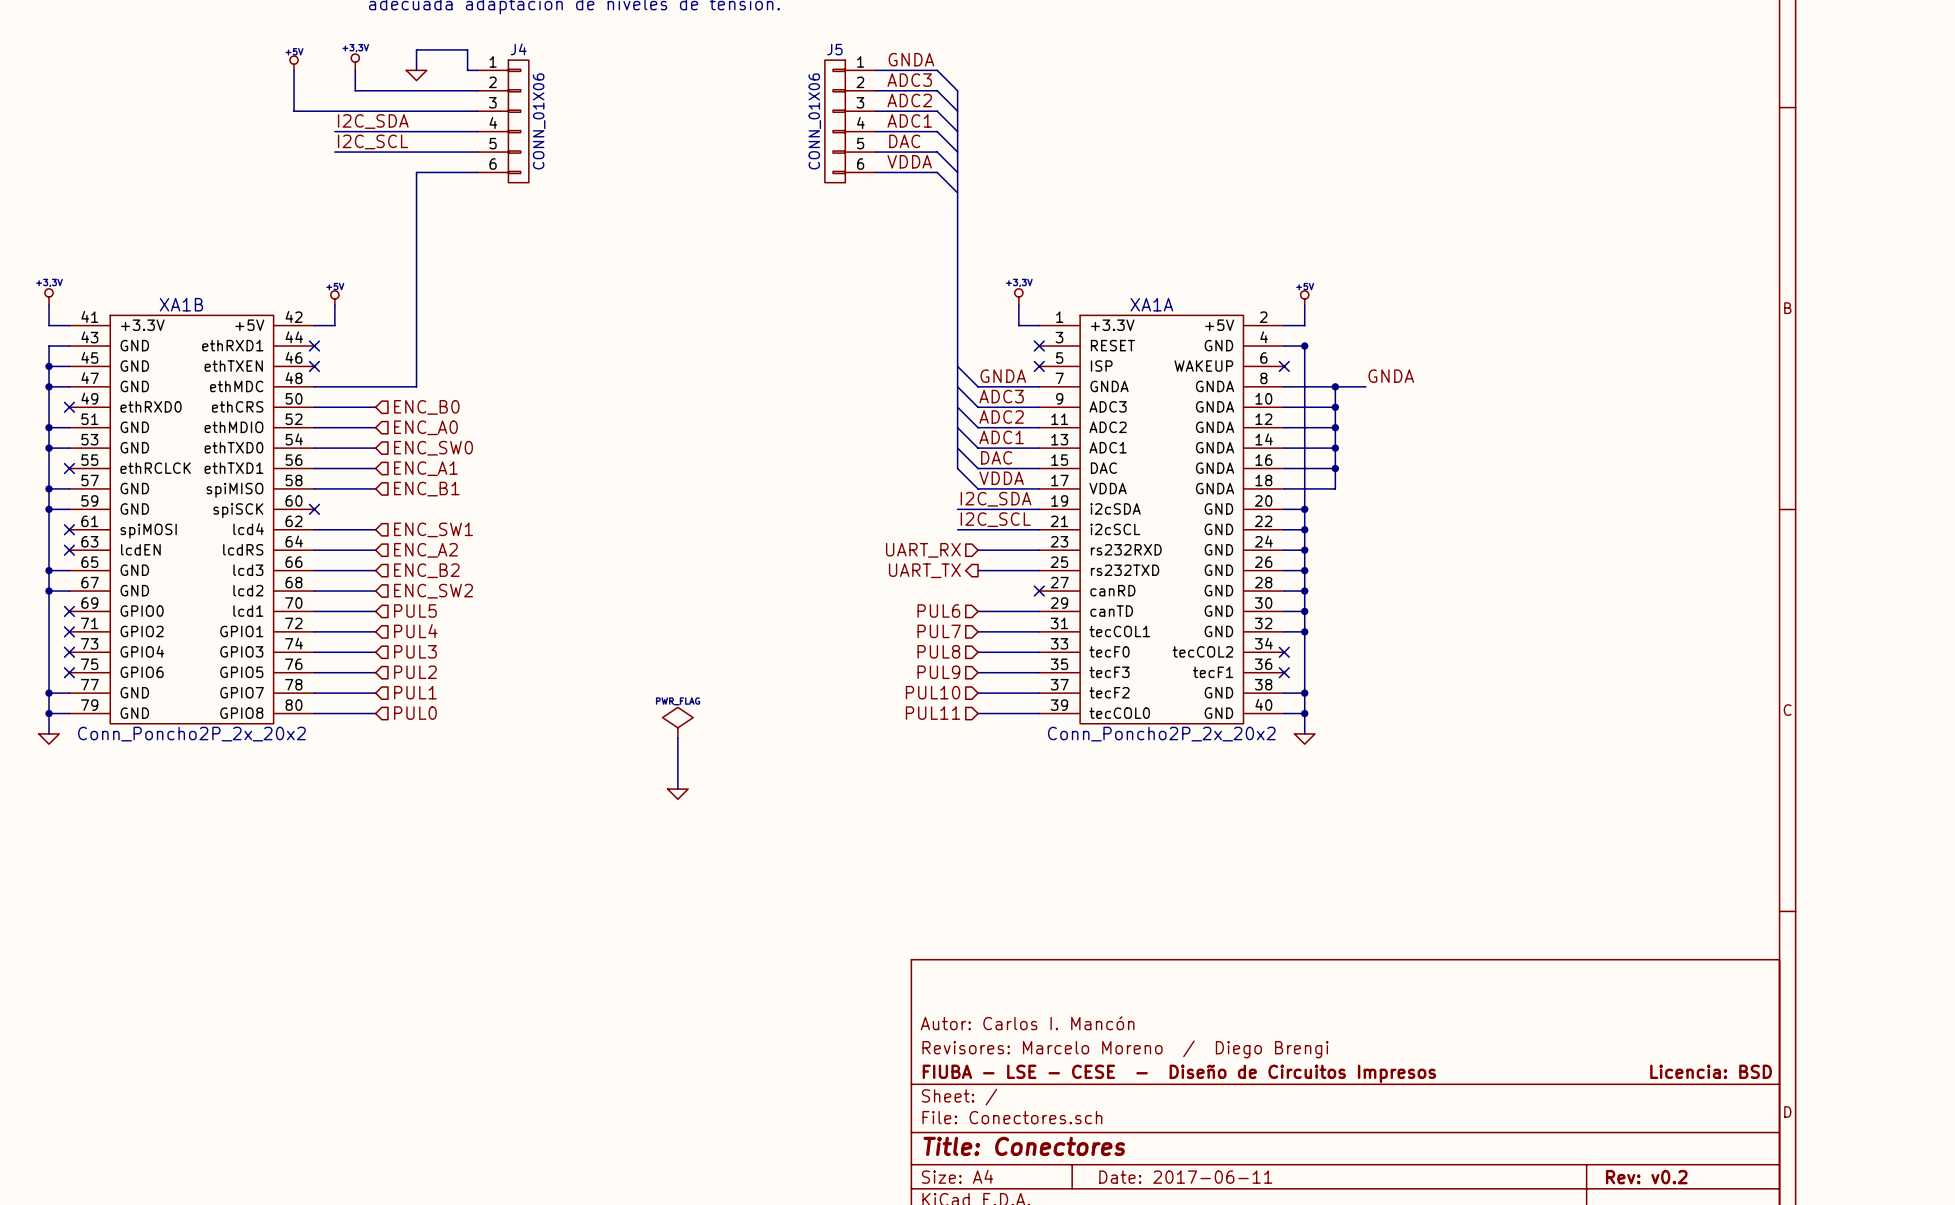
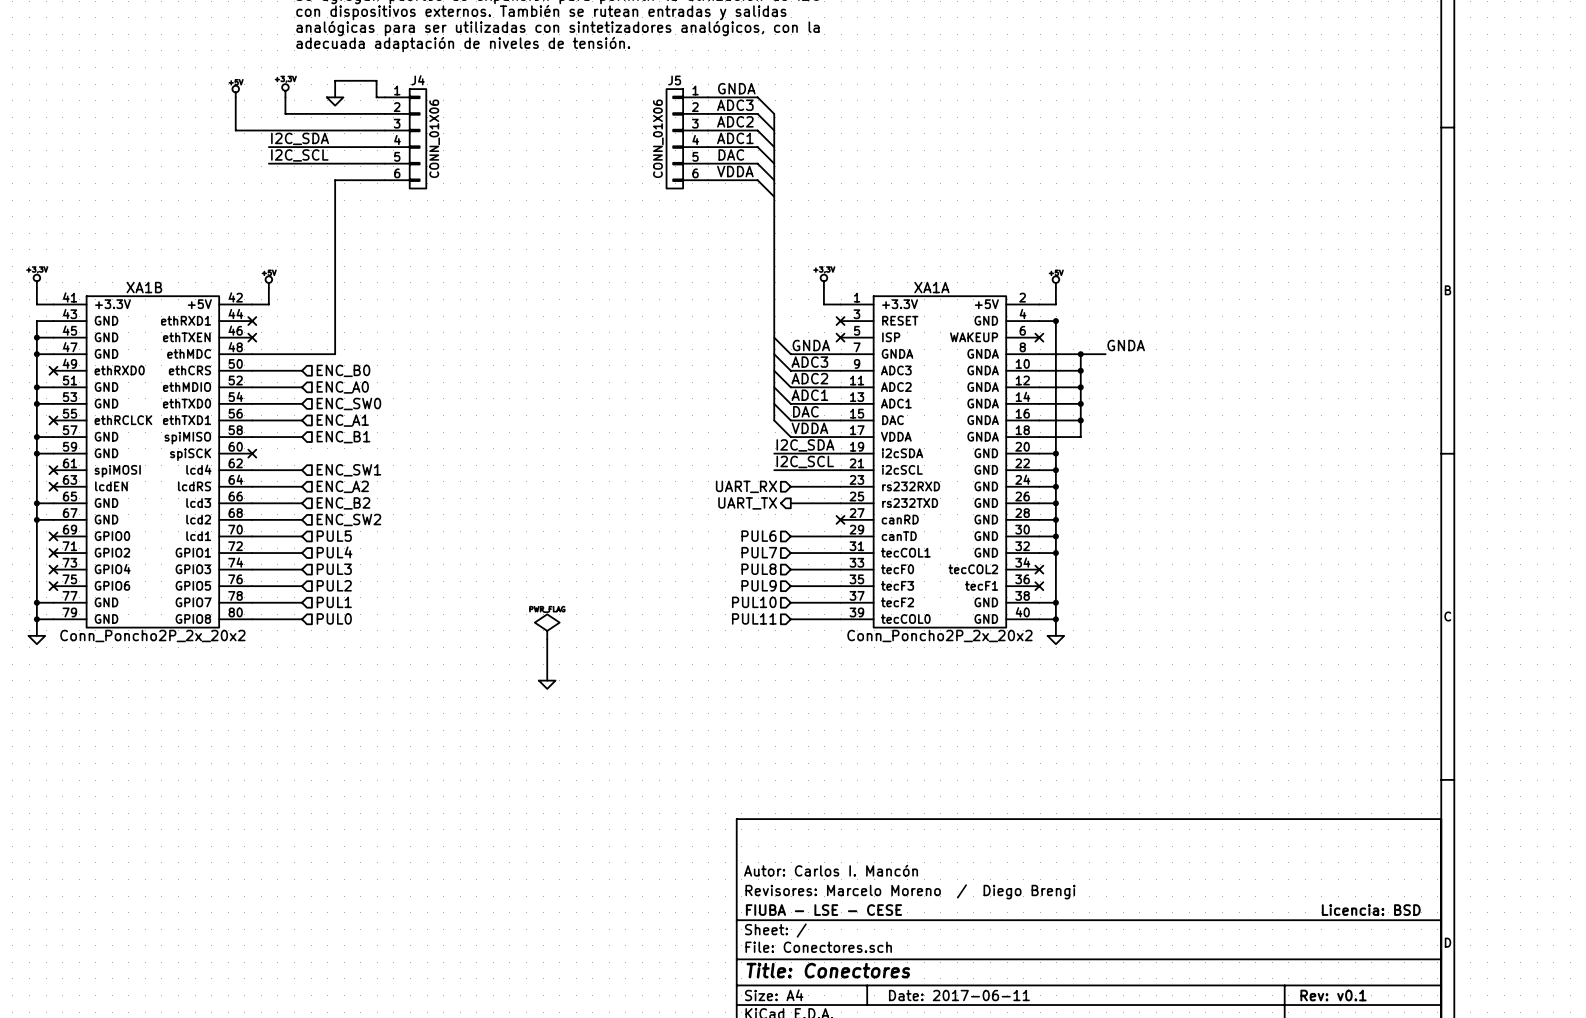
title block: FIUBA - LSE - CESE - Diseño de Circuitos Impresos Licencia: BSD (1347, 1073) -> FIUBA - LSE - CESE Licencia: BSD (1083, 910)
title block: Rev: v0.2 (1646, 1177) -> Rev: v0.1 (1333, 995)

